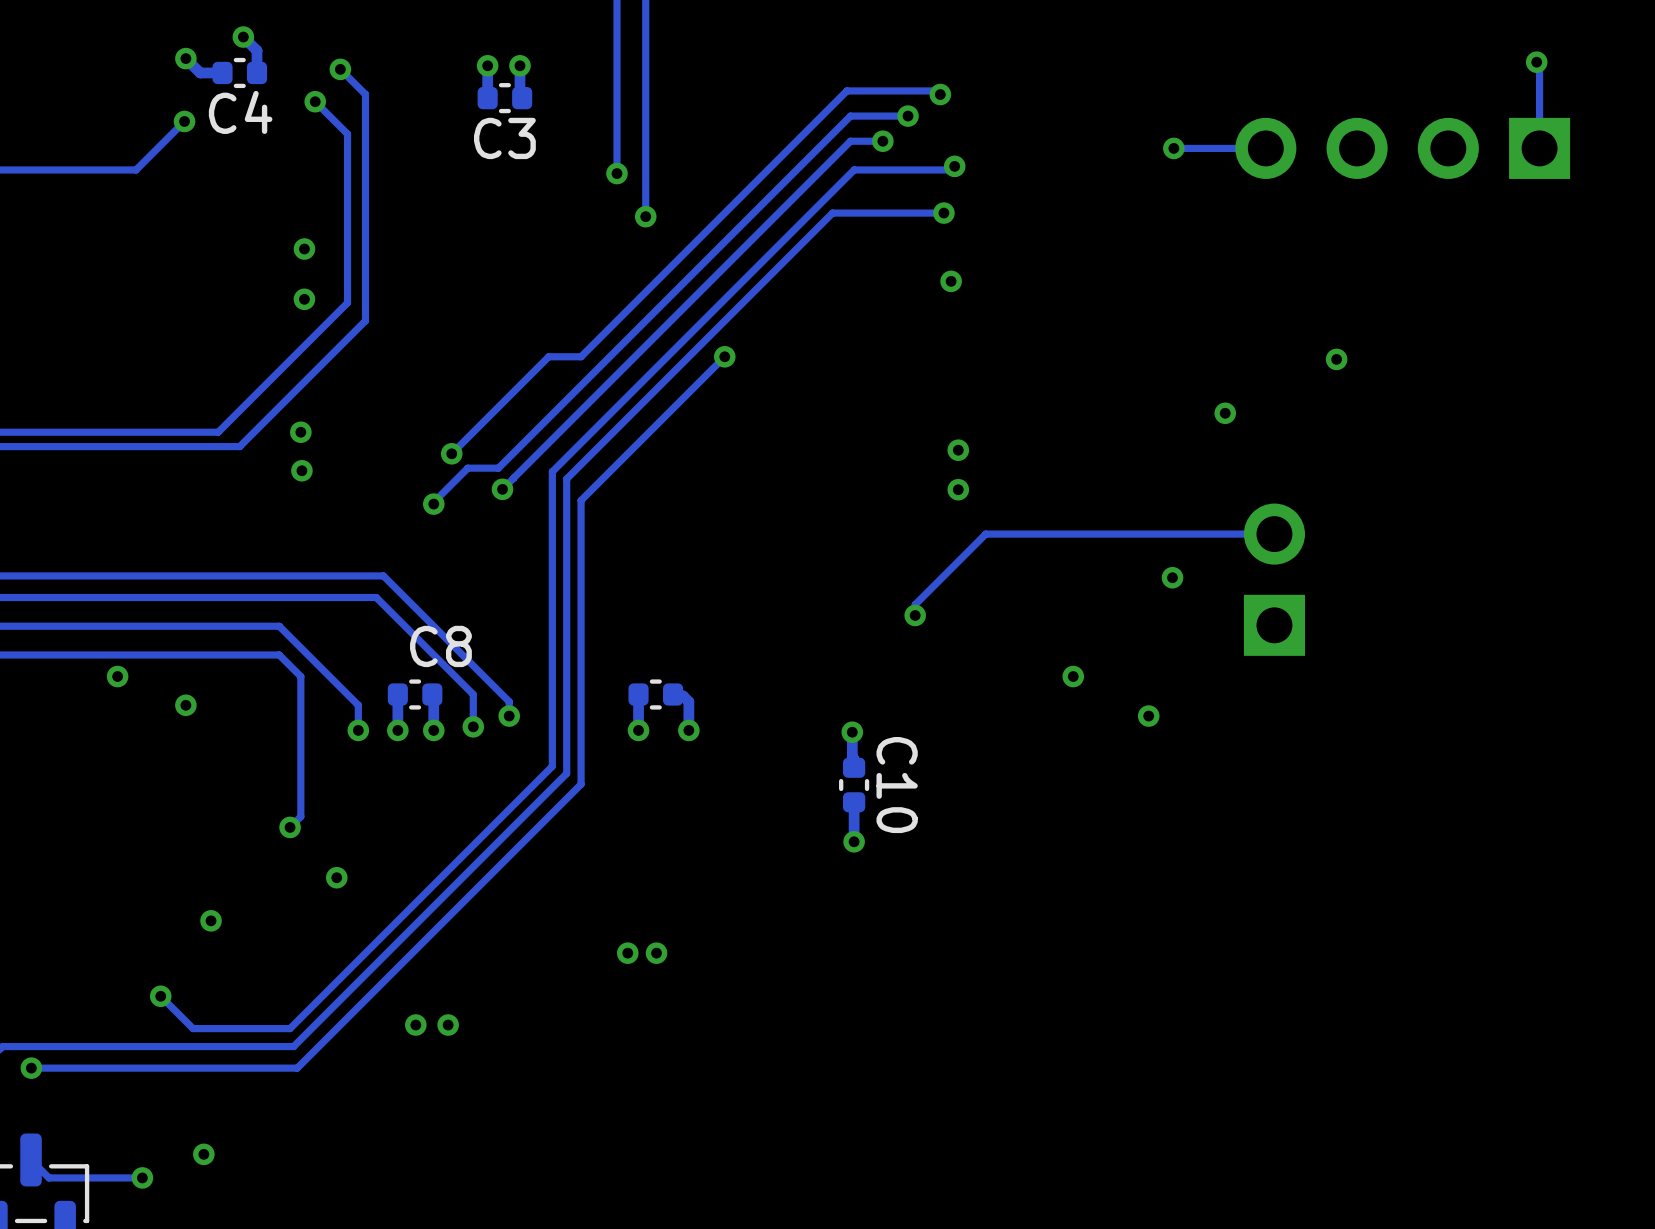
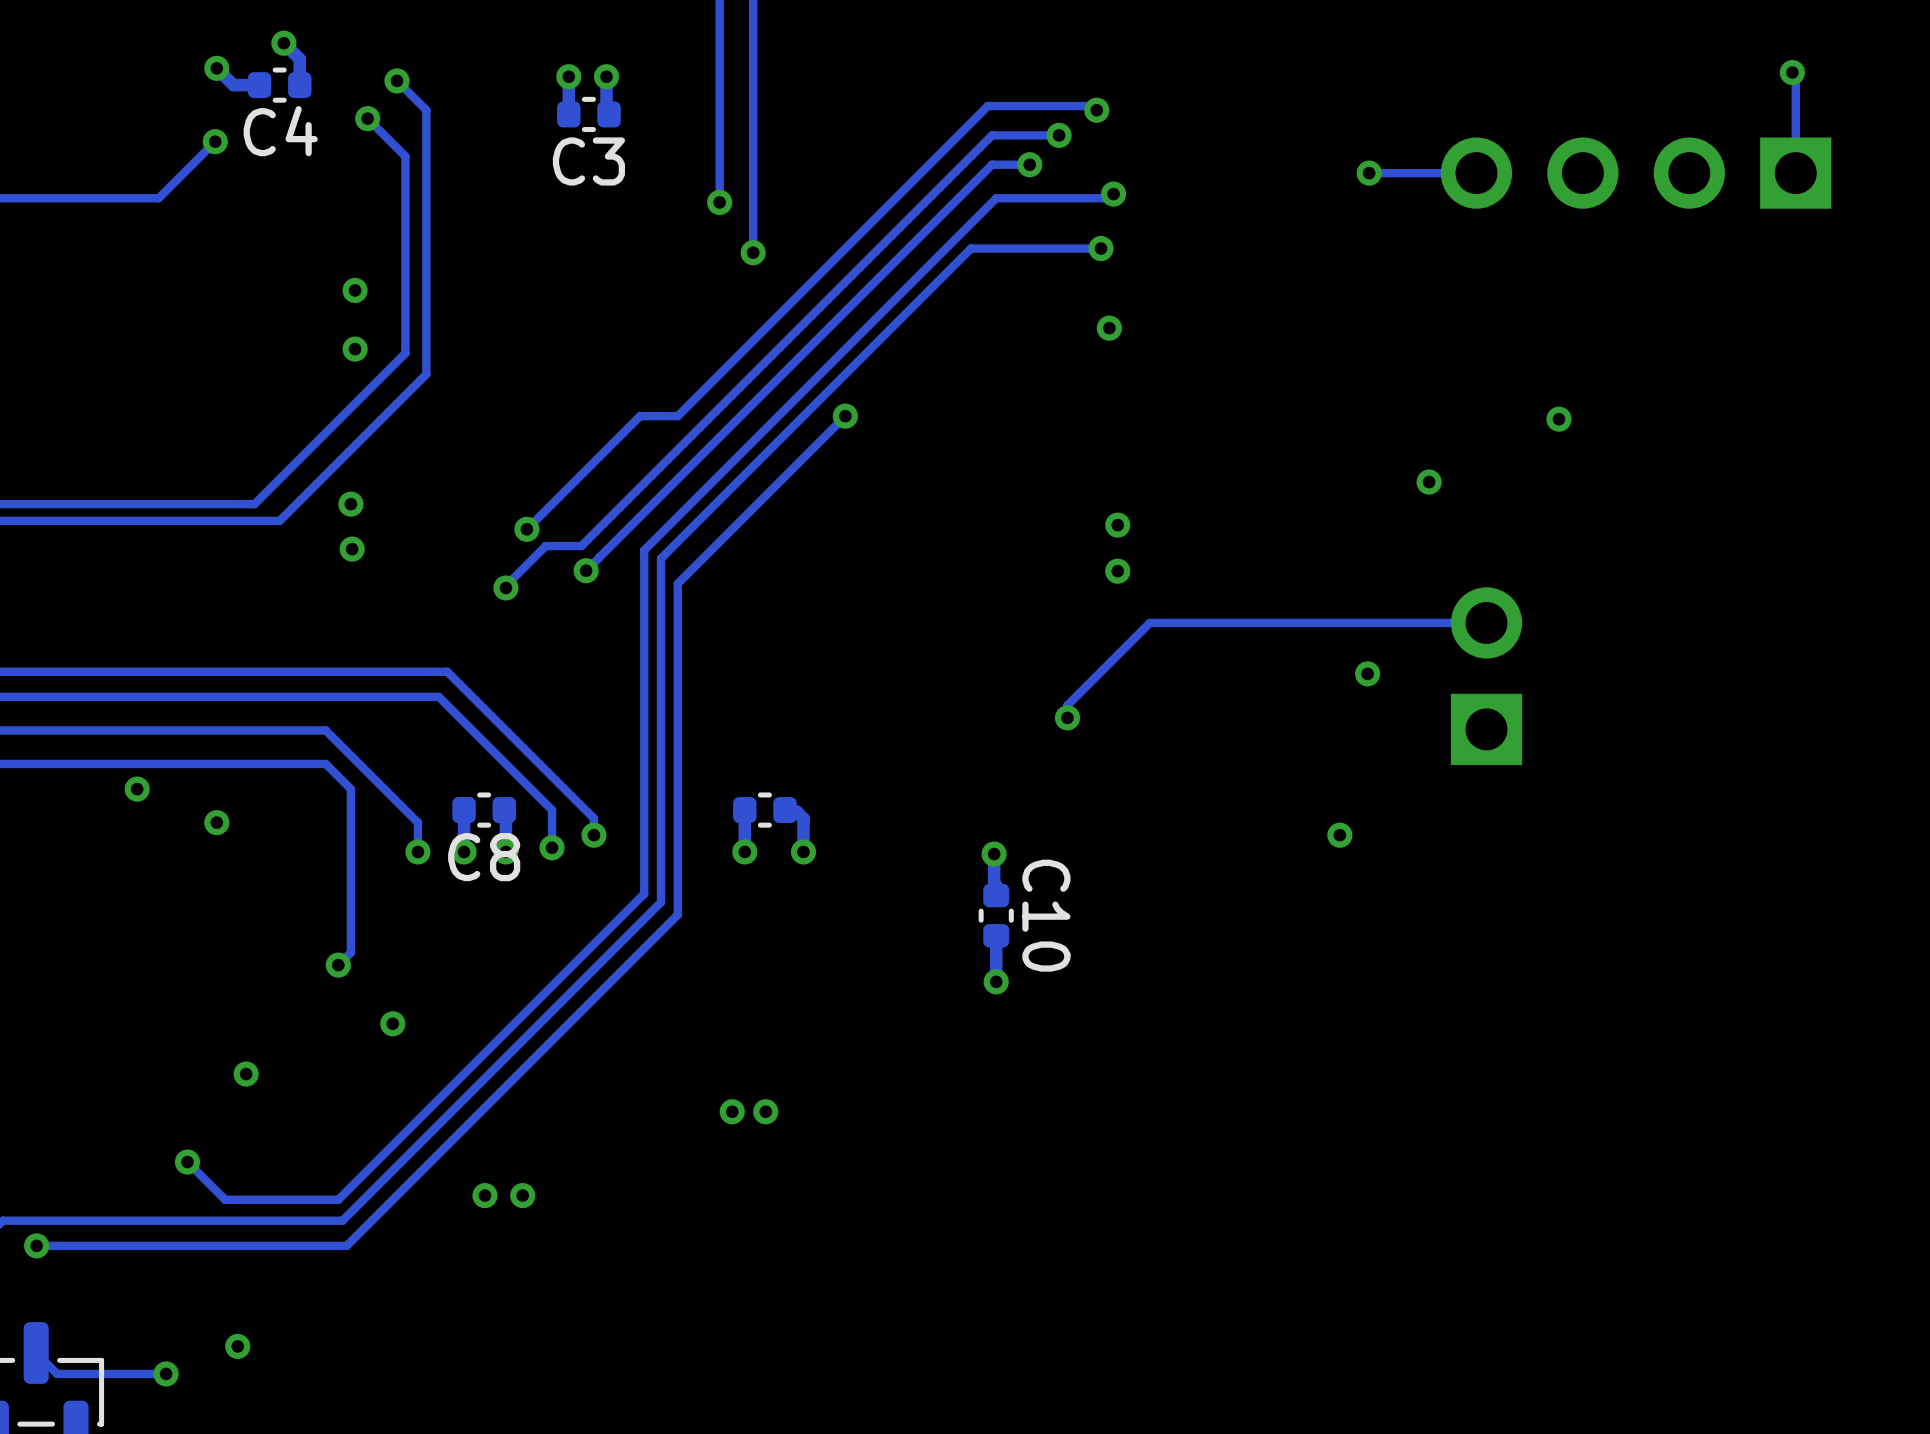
C8 name position: C8 (440, 646) -> C8 (484, 857)
via: (1073, 676) -> none

